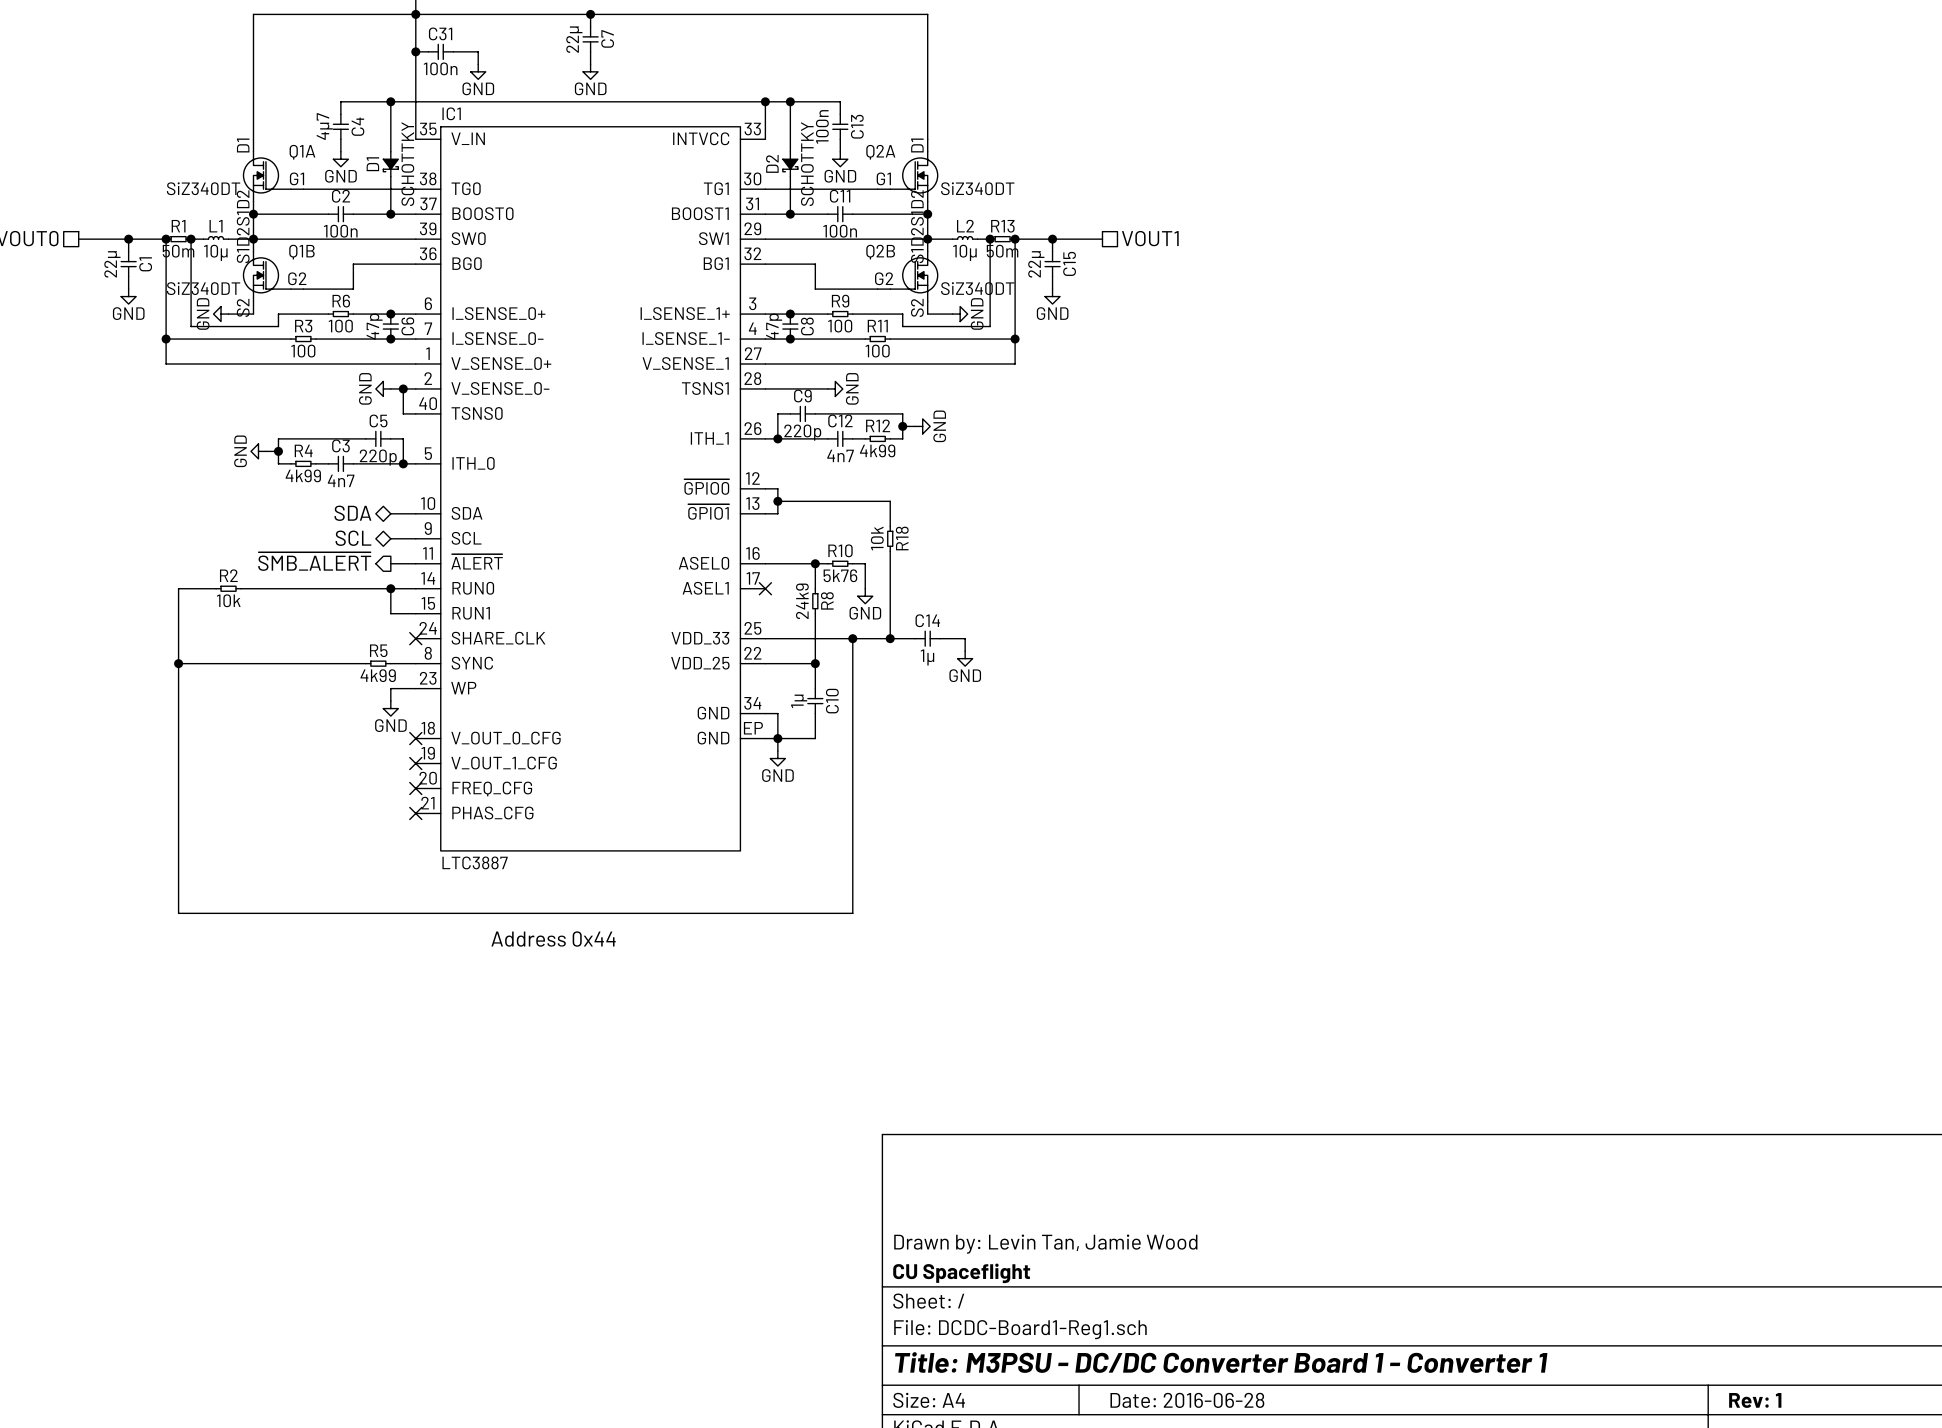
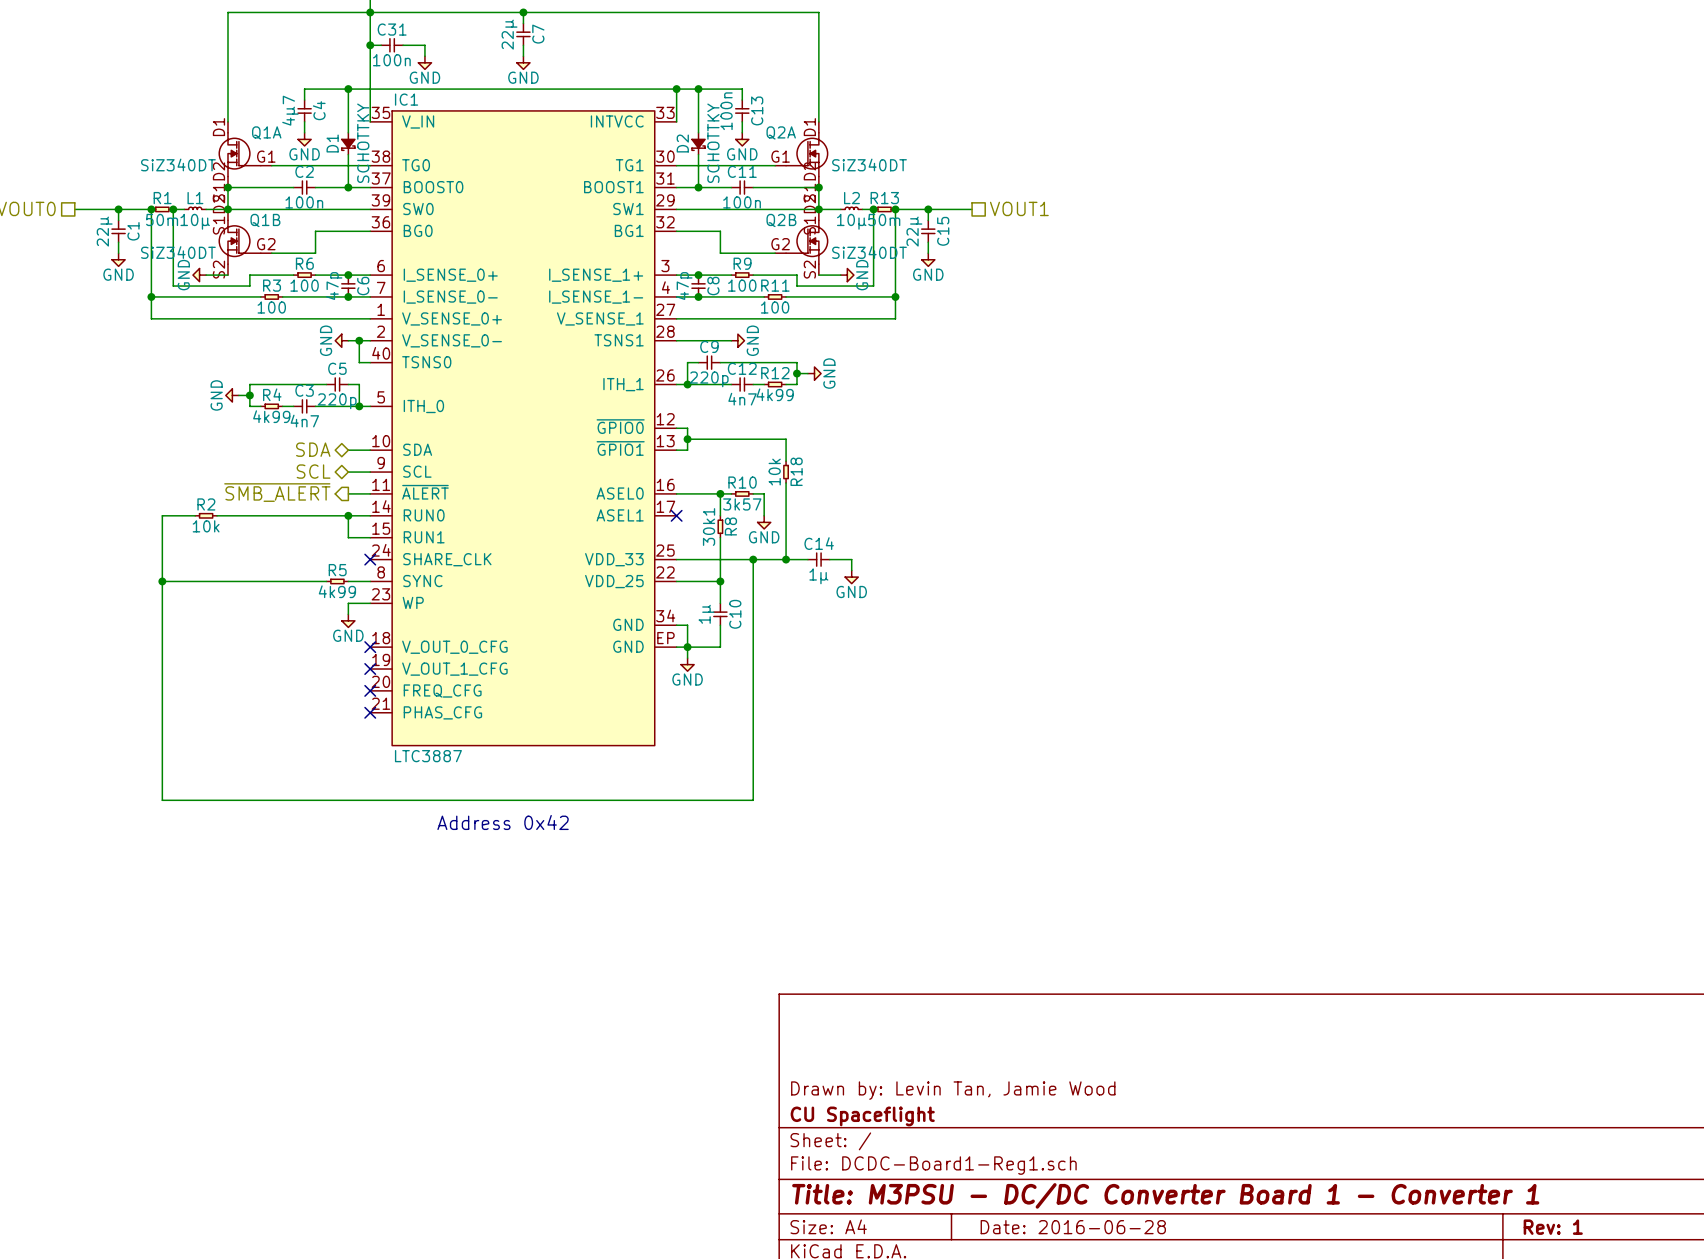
R10 value: 5k76 (840, 575) -> 3k57 (742, 504)
R8 value: 24k9 (802, 601) -> 30k1 (709, 527)
text: Address 0x44 (553, 939) -> Address 0x42 (503, 822)

